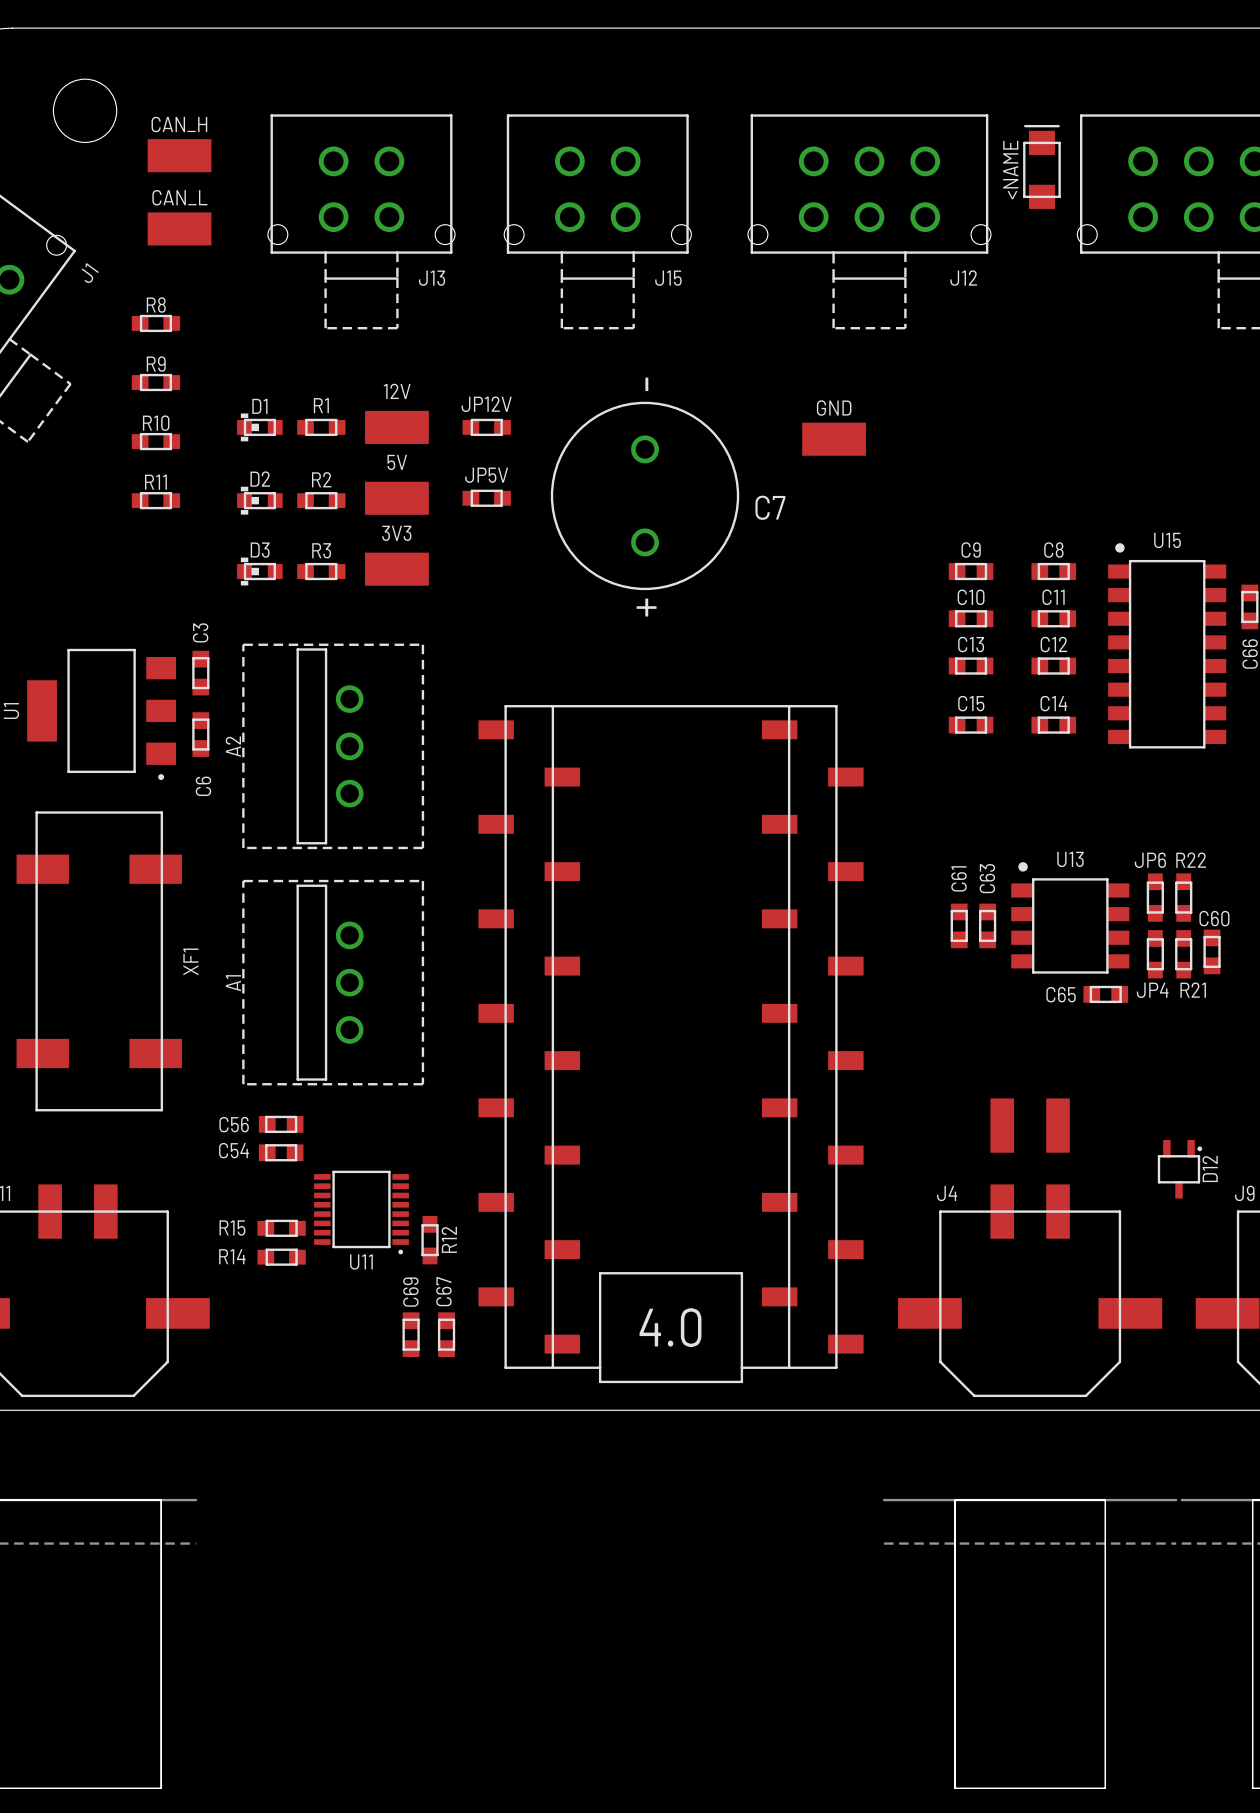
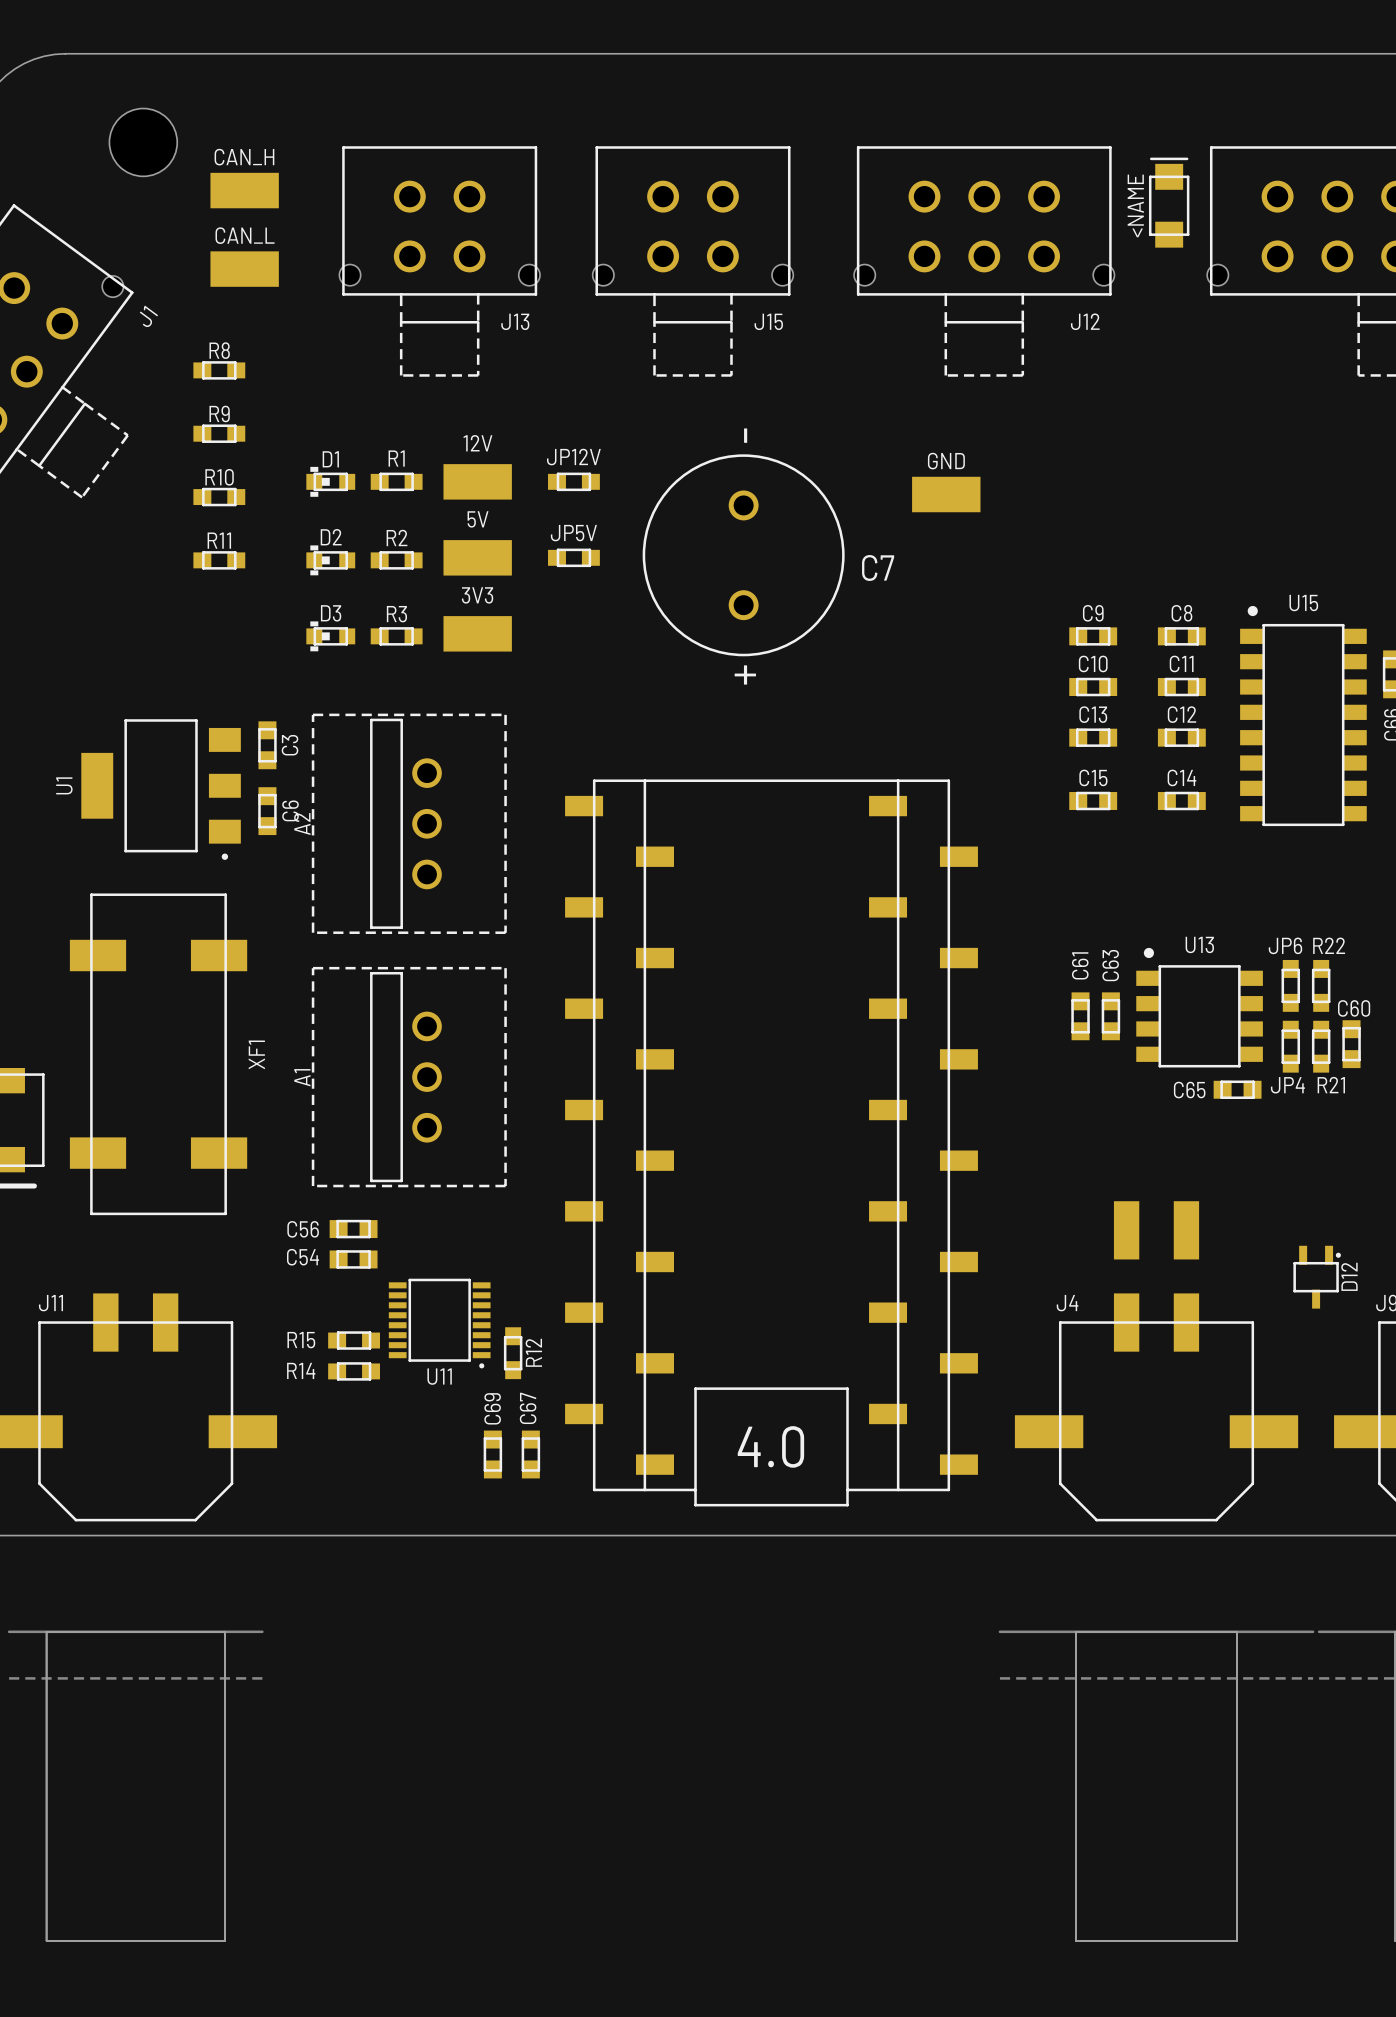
C3 name position: C3 (200, 632) -> C3 (289, 745)
C6 name position: C6 (203, 786) -> C6 (290, 810)

